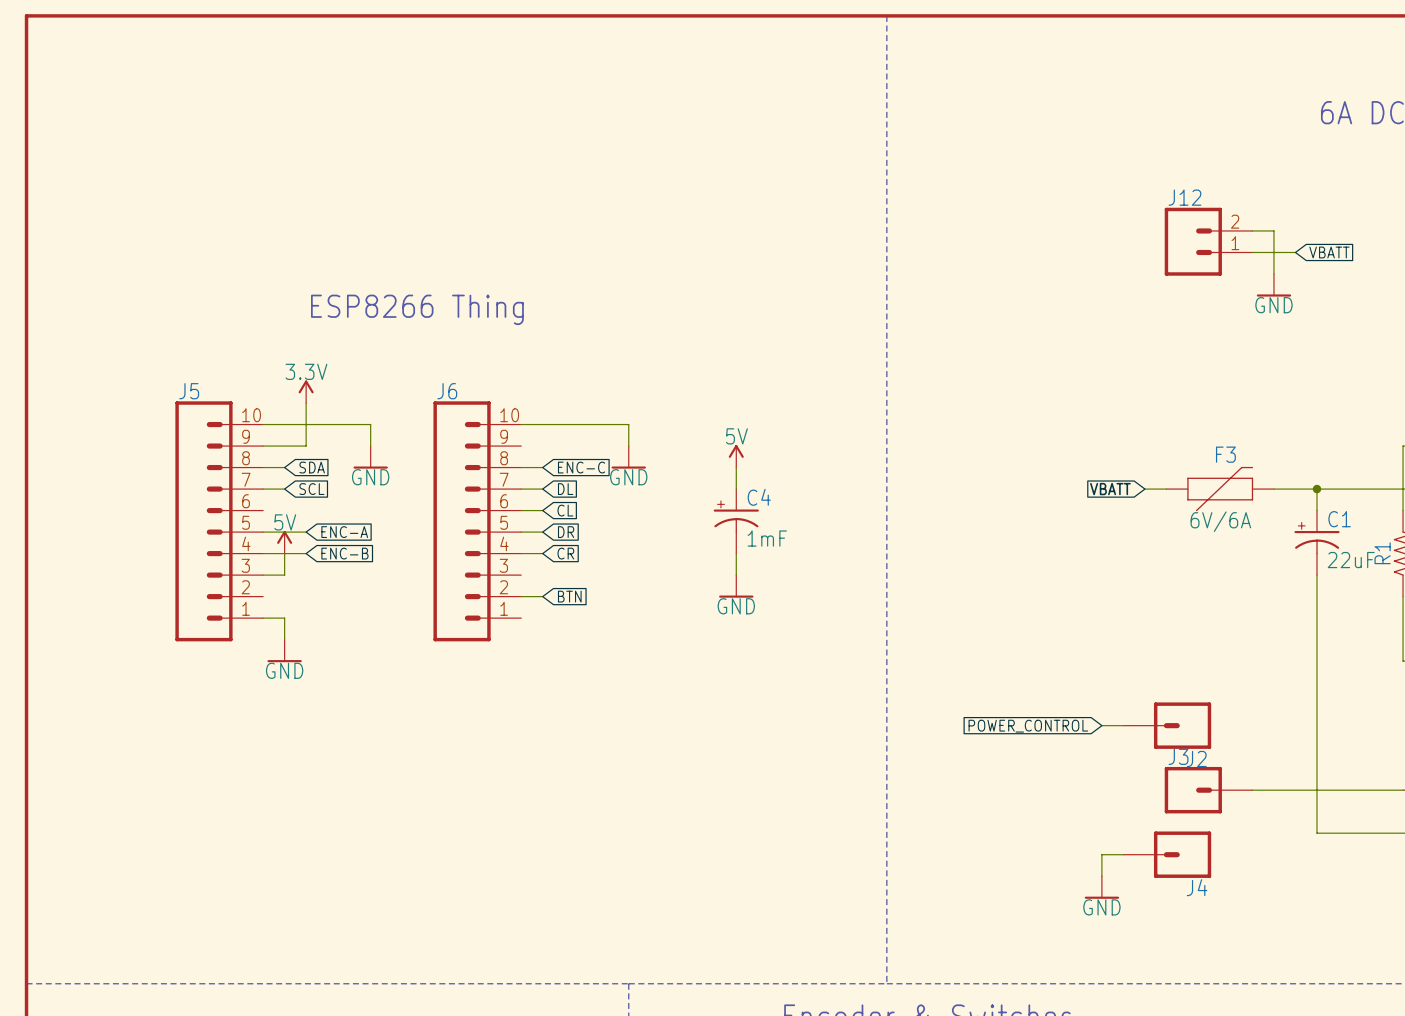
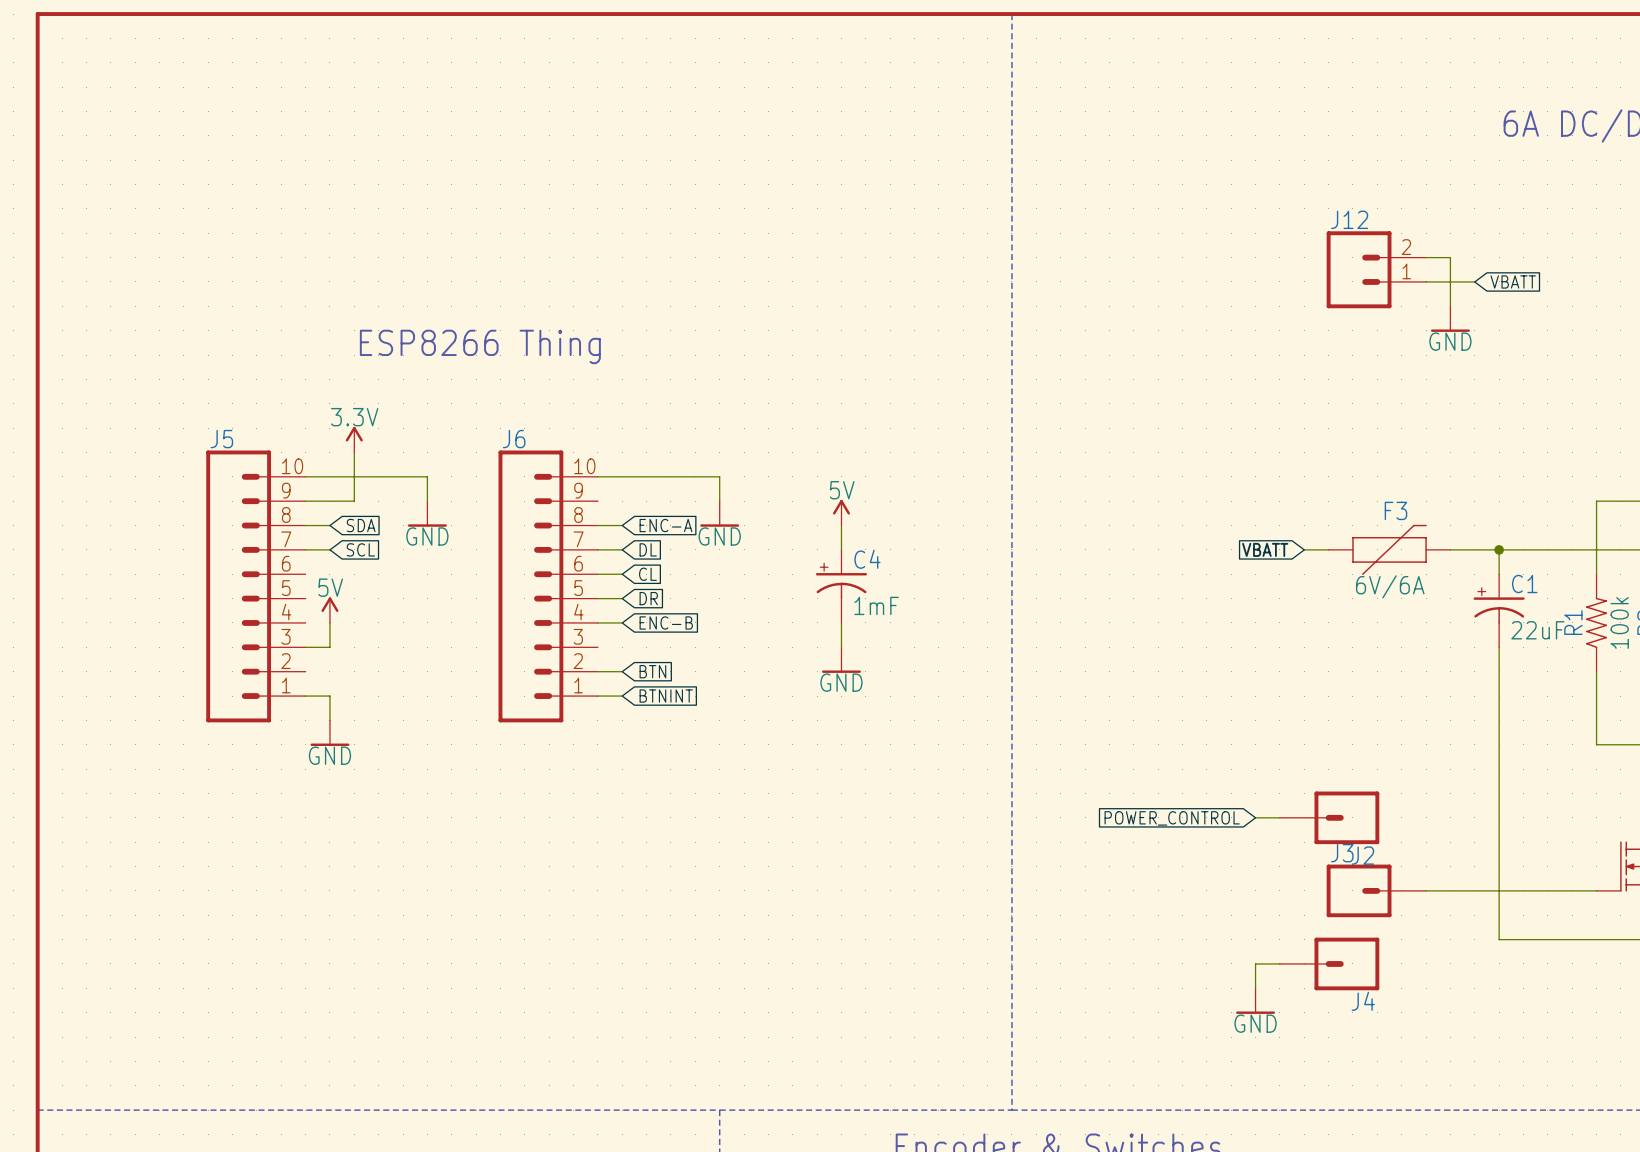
global label: ENC-C (581, 467) -> ENC-A (665, 525)
wire: (263, 532) (306, 532) -> none
global label: ENC-A (344, 532) -> none
wire: (263, 553) (306, 553) -> none
global label: ENC-B (344, 553) -> none
global label: CR (565, 553) -> ENC-B (666, 622)
wire: none -> (597, 696) (622, 696)
global label: none -> BTNINT (666, 696)

